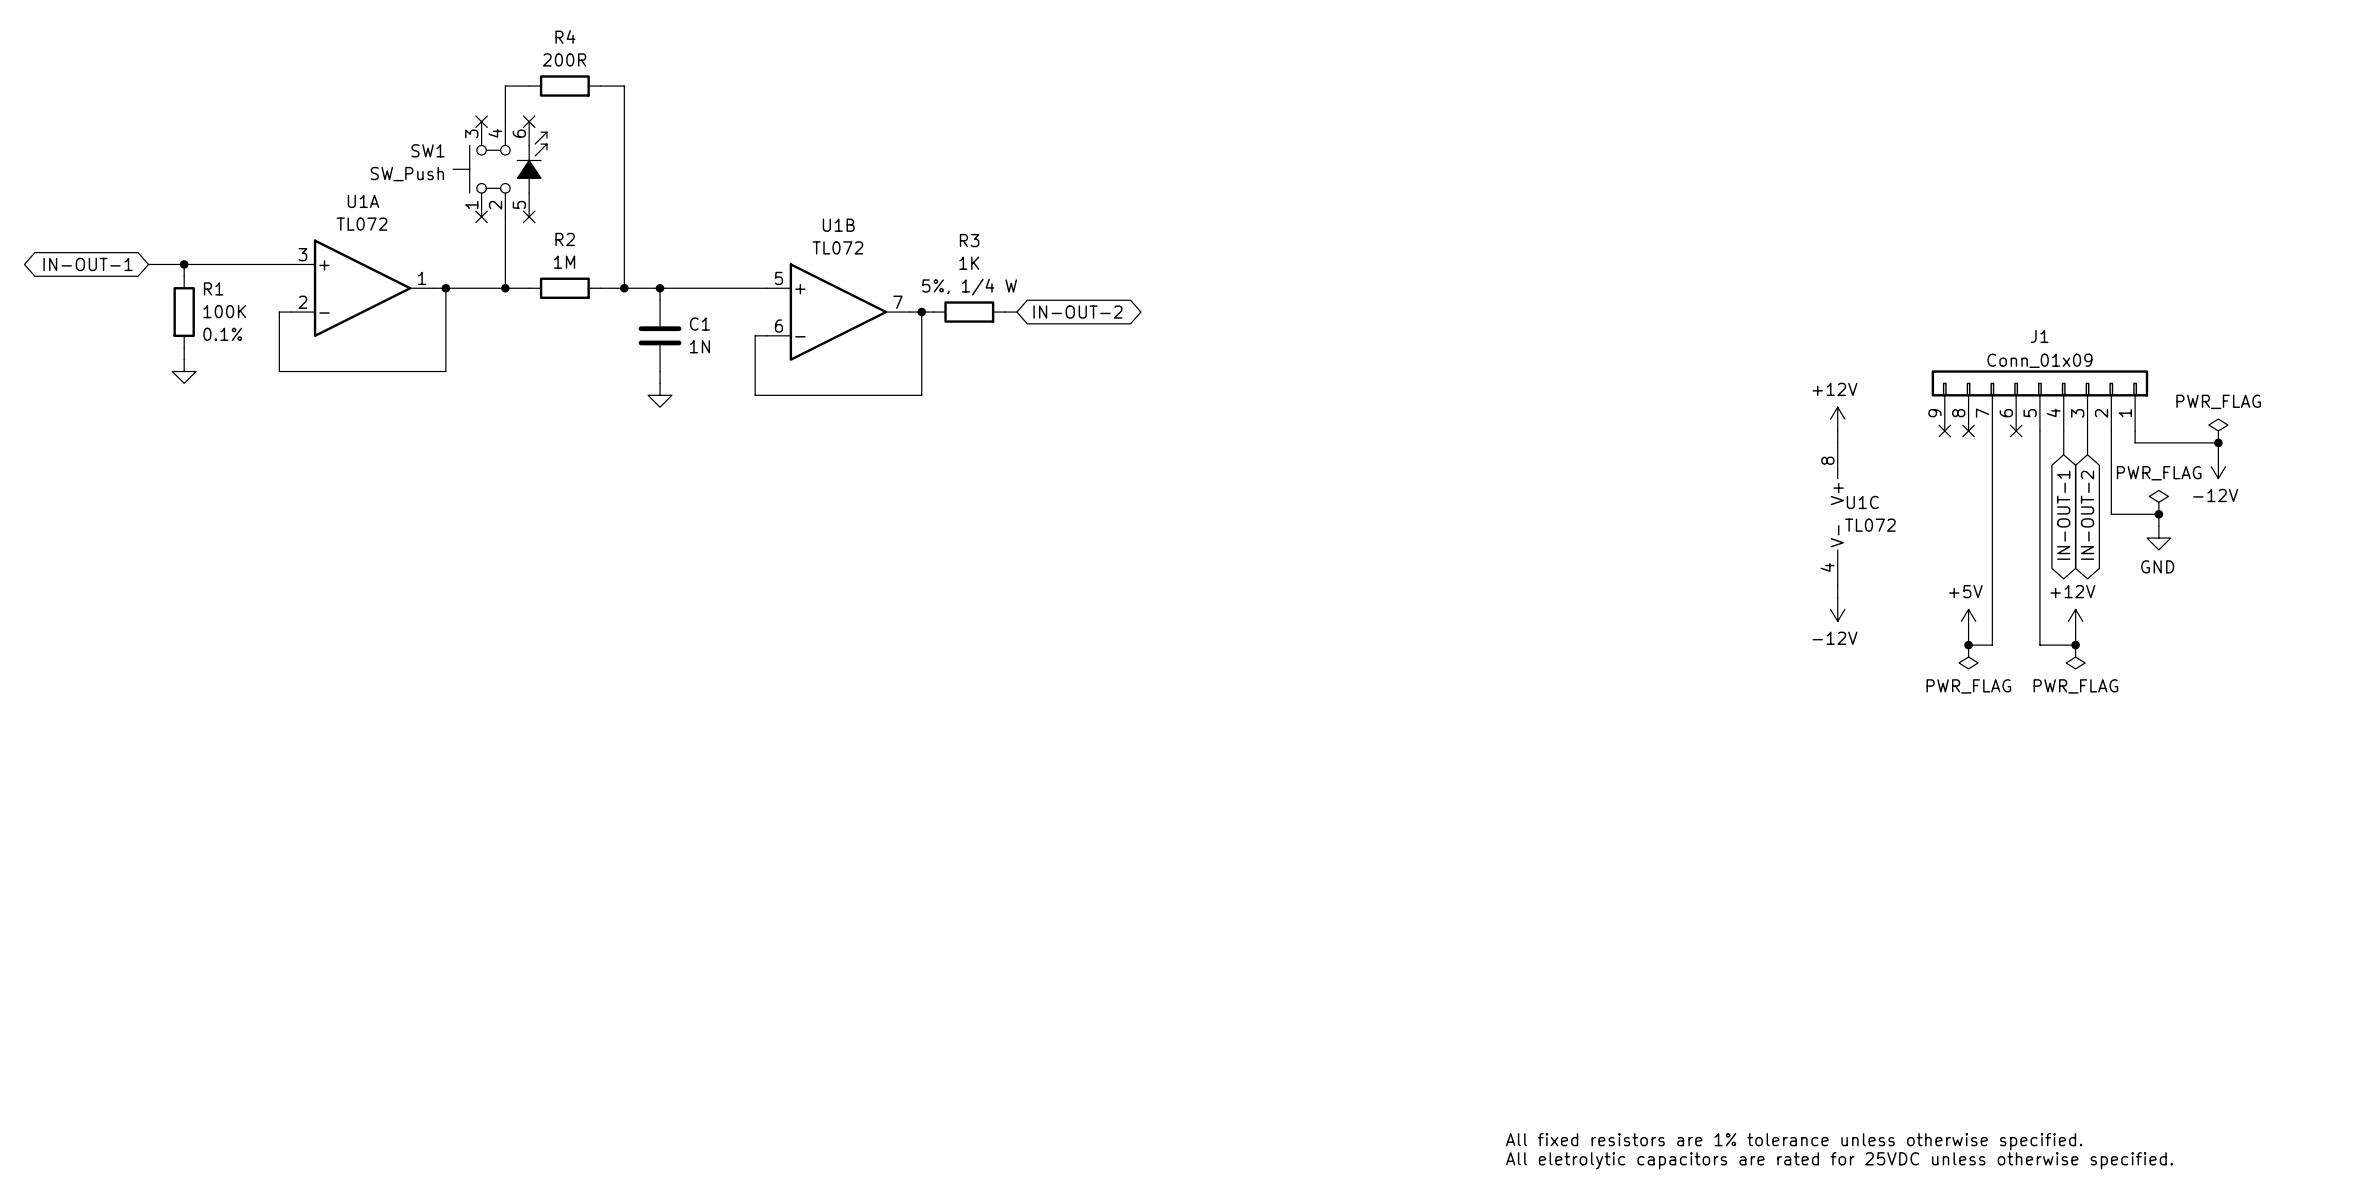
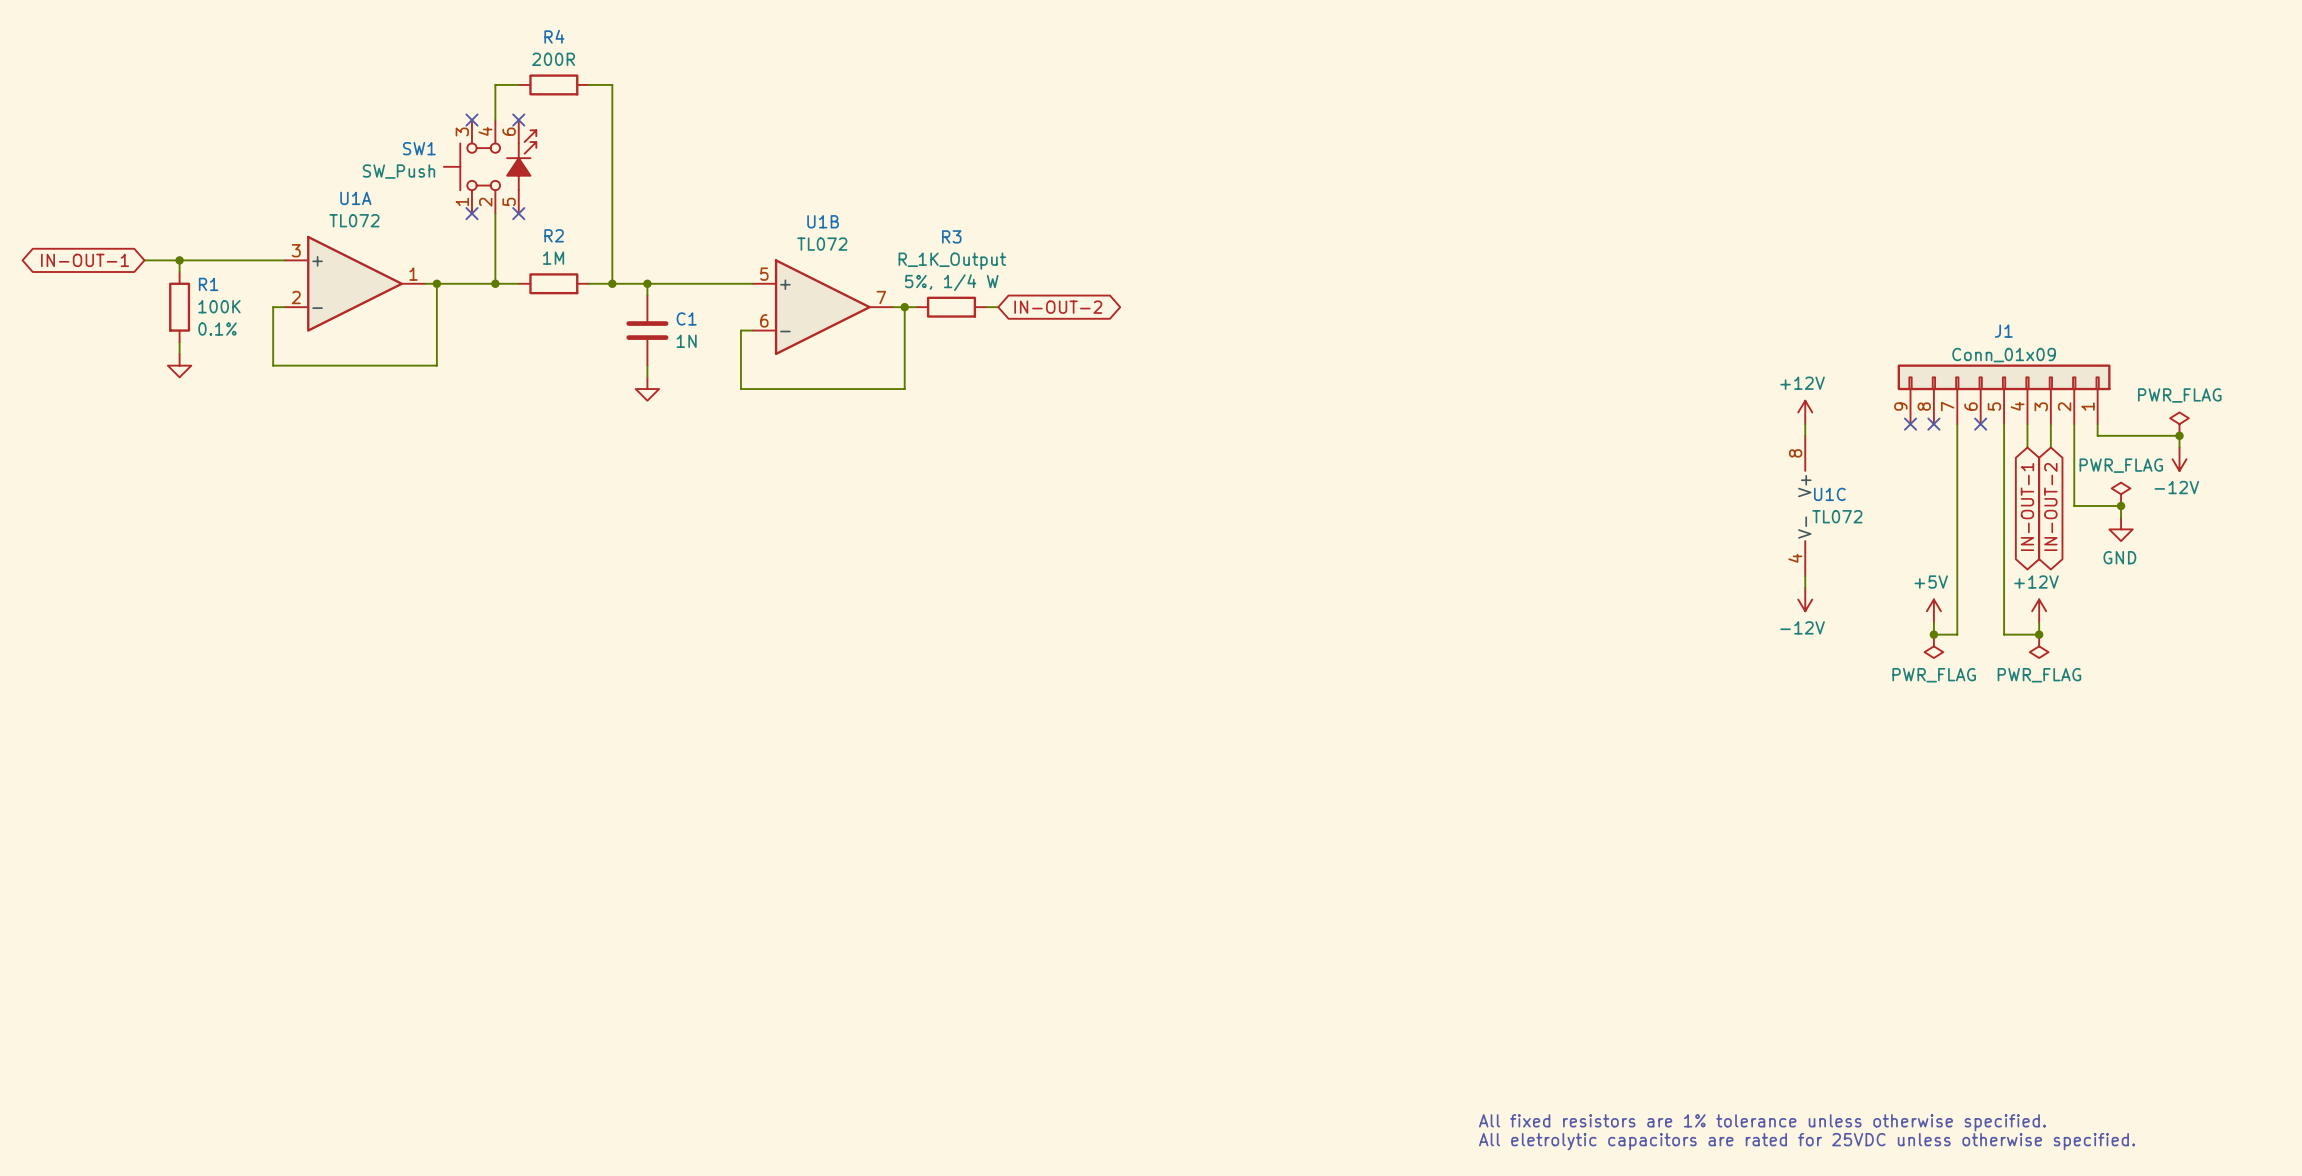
R3 value: 1K (969, 263) -> R_1K_Output (952, 261)

